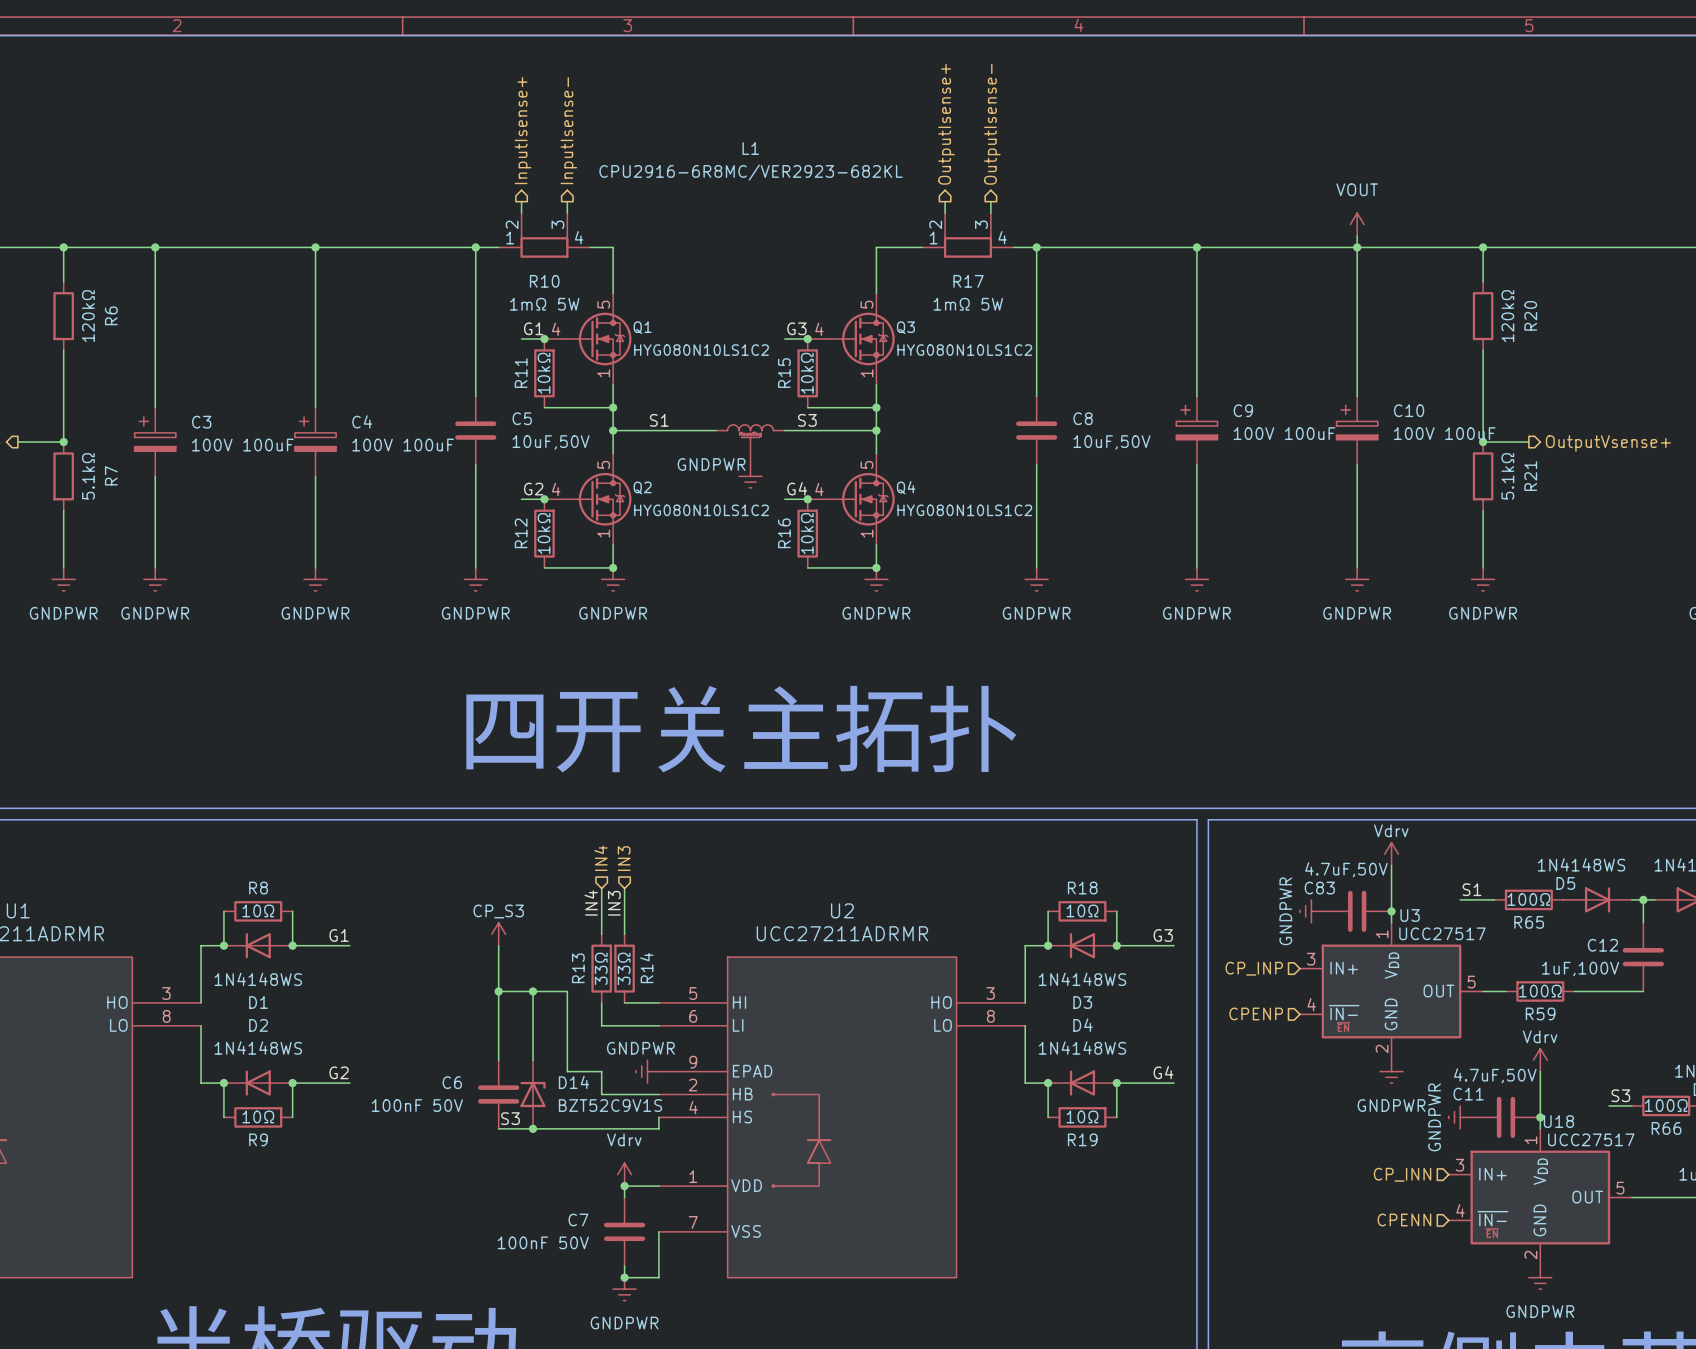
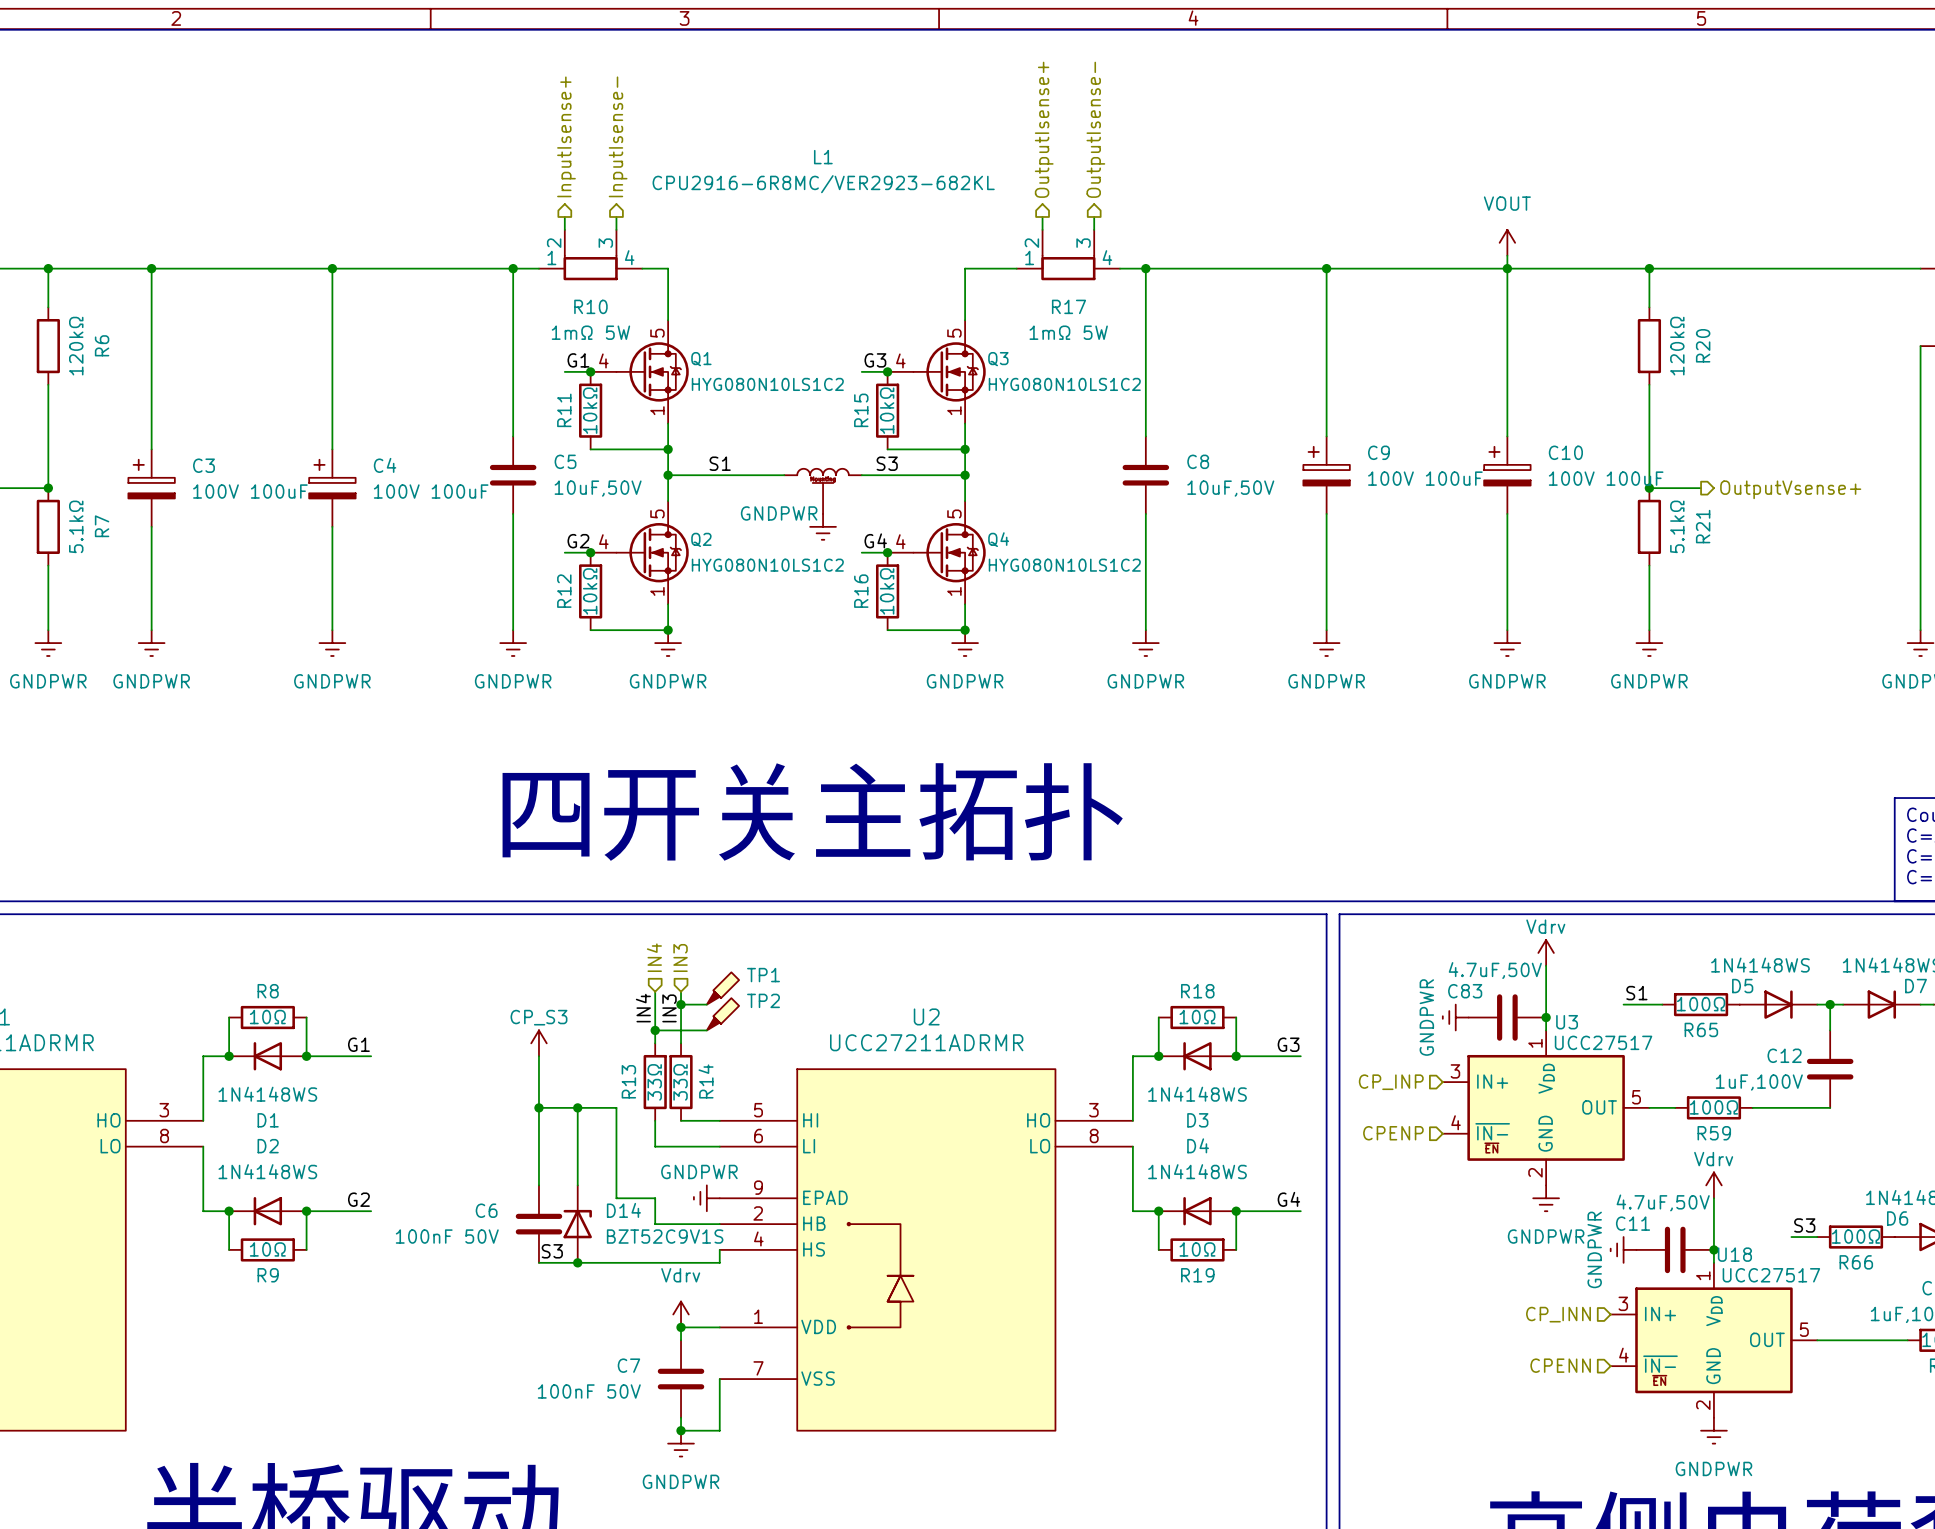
TP1: none -> (722, 988)
wire: none -> (681, 1004) (706, 1004)
junction: none -> (681, 1004)
TP2: none -> (722, 1014)
wire: none -> (655, 1030) (706, 1030)
junction: none -> (655, 1030)

